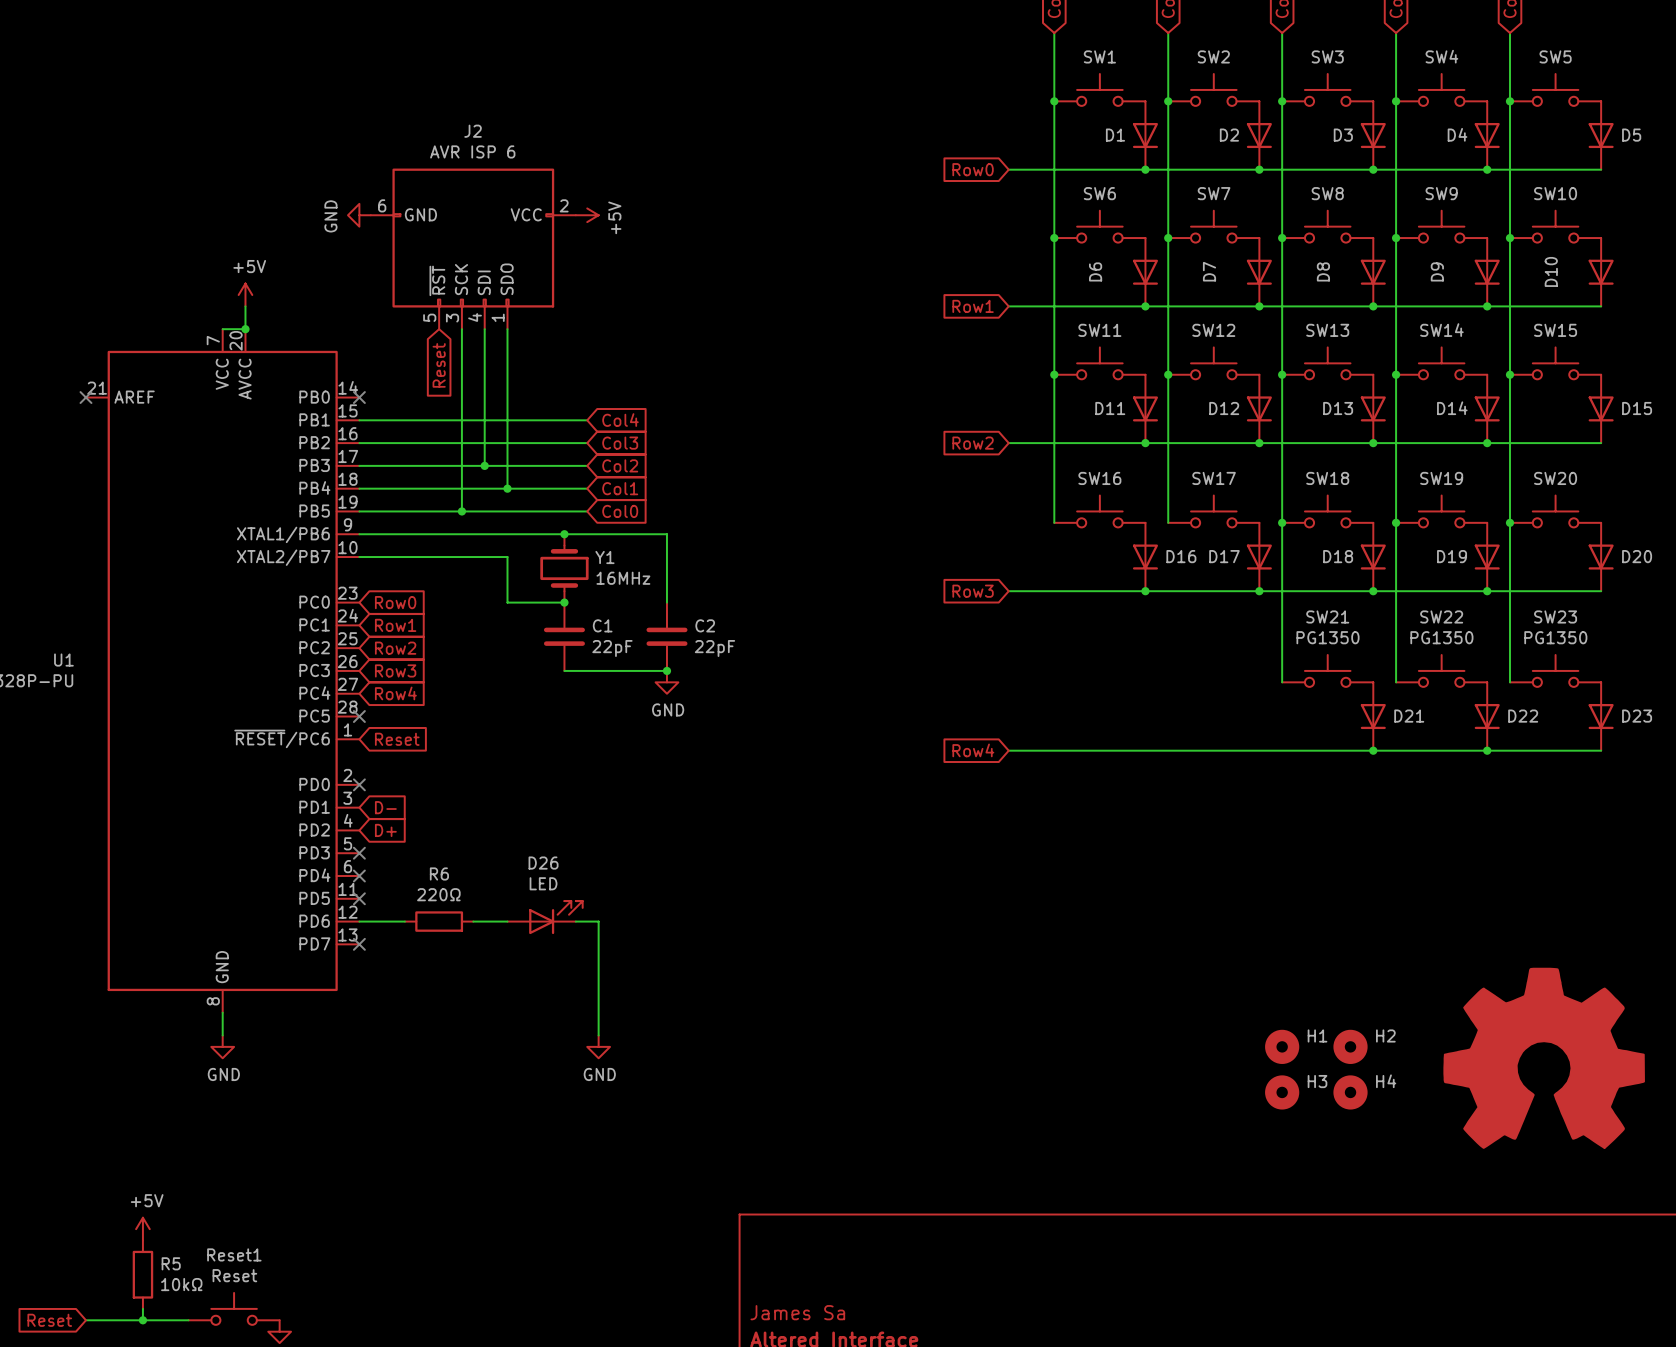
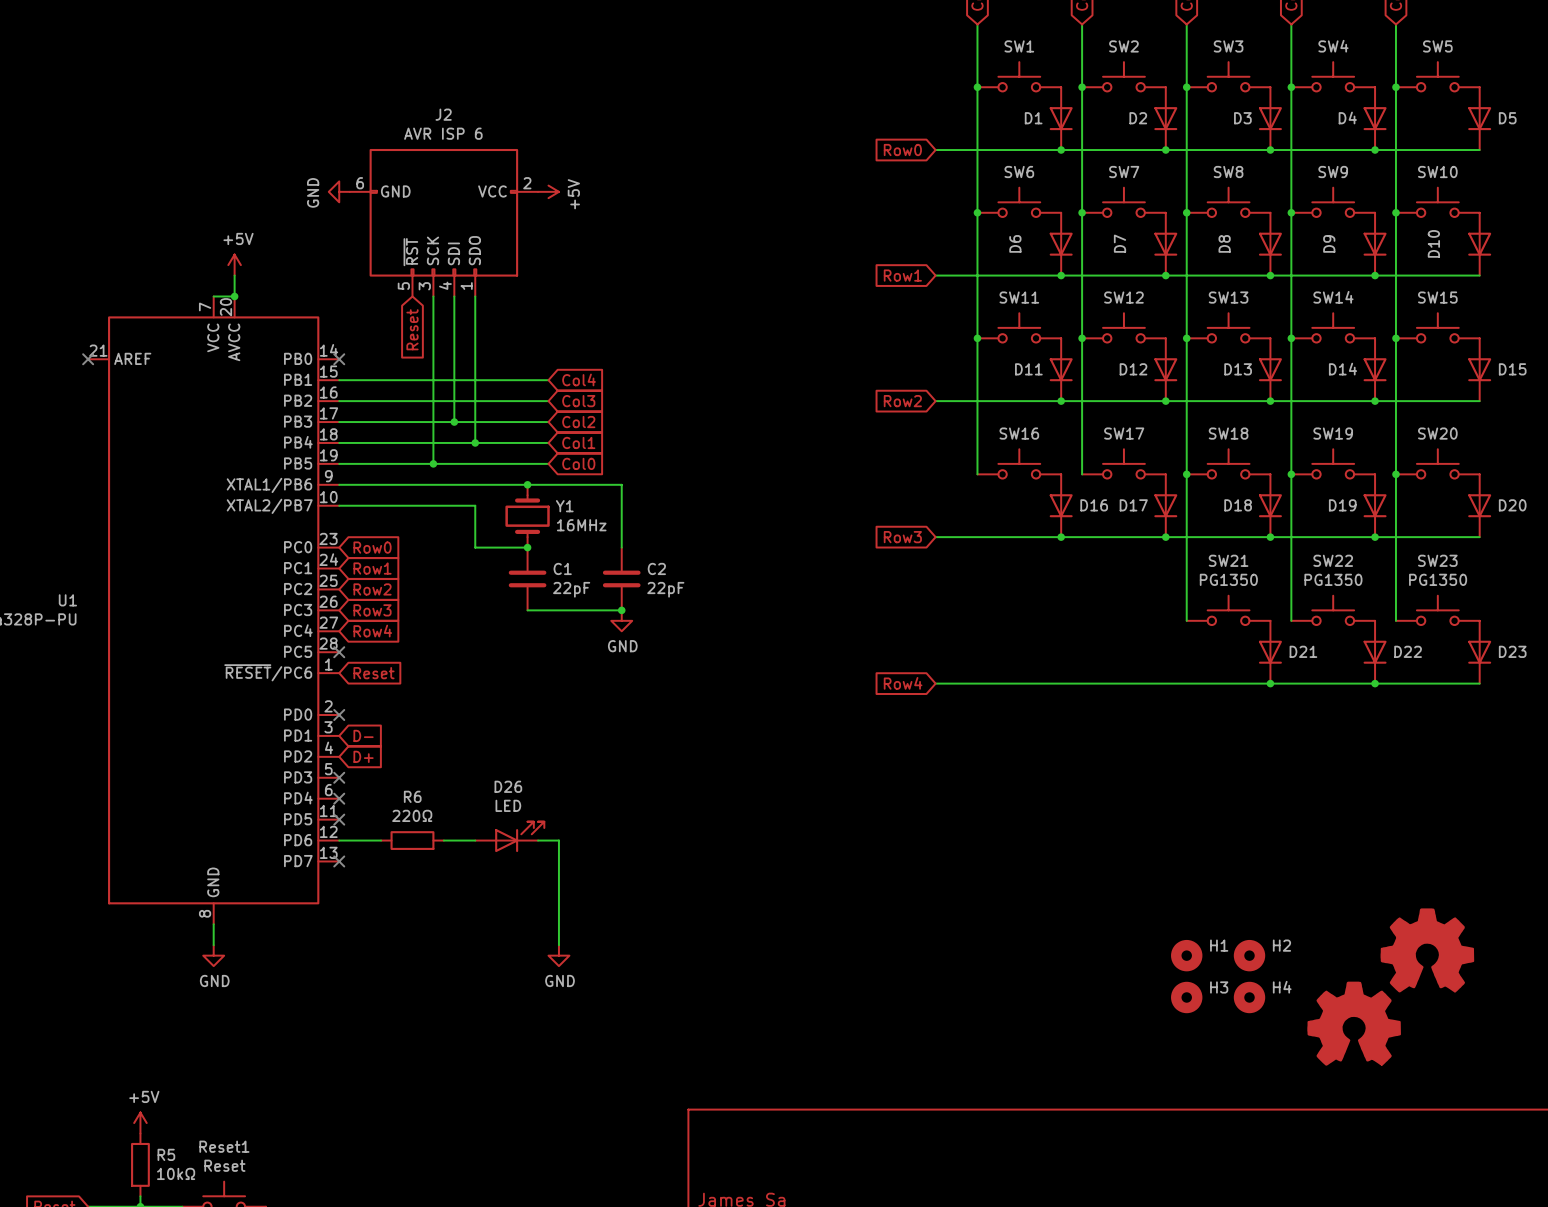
power symbol: none -> (1427, 950)
power symbol: (1544, 1058) -> none
power symbol: none -> (1354, 1023)

